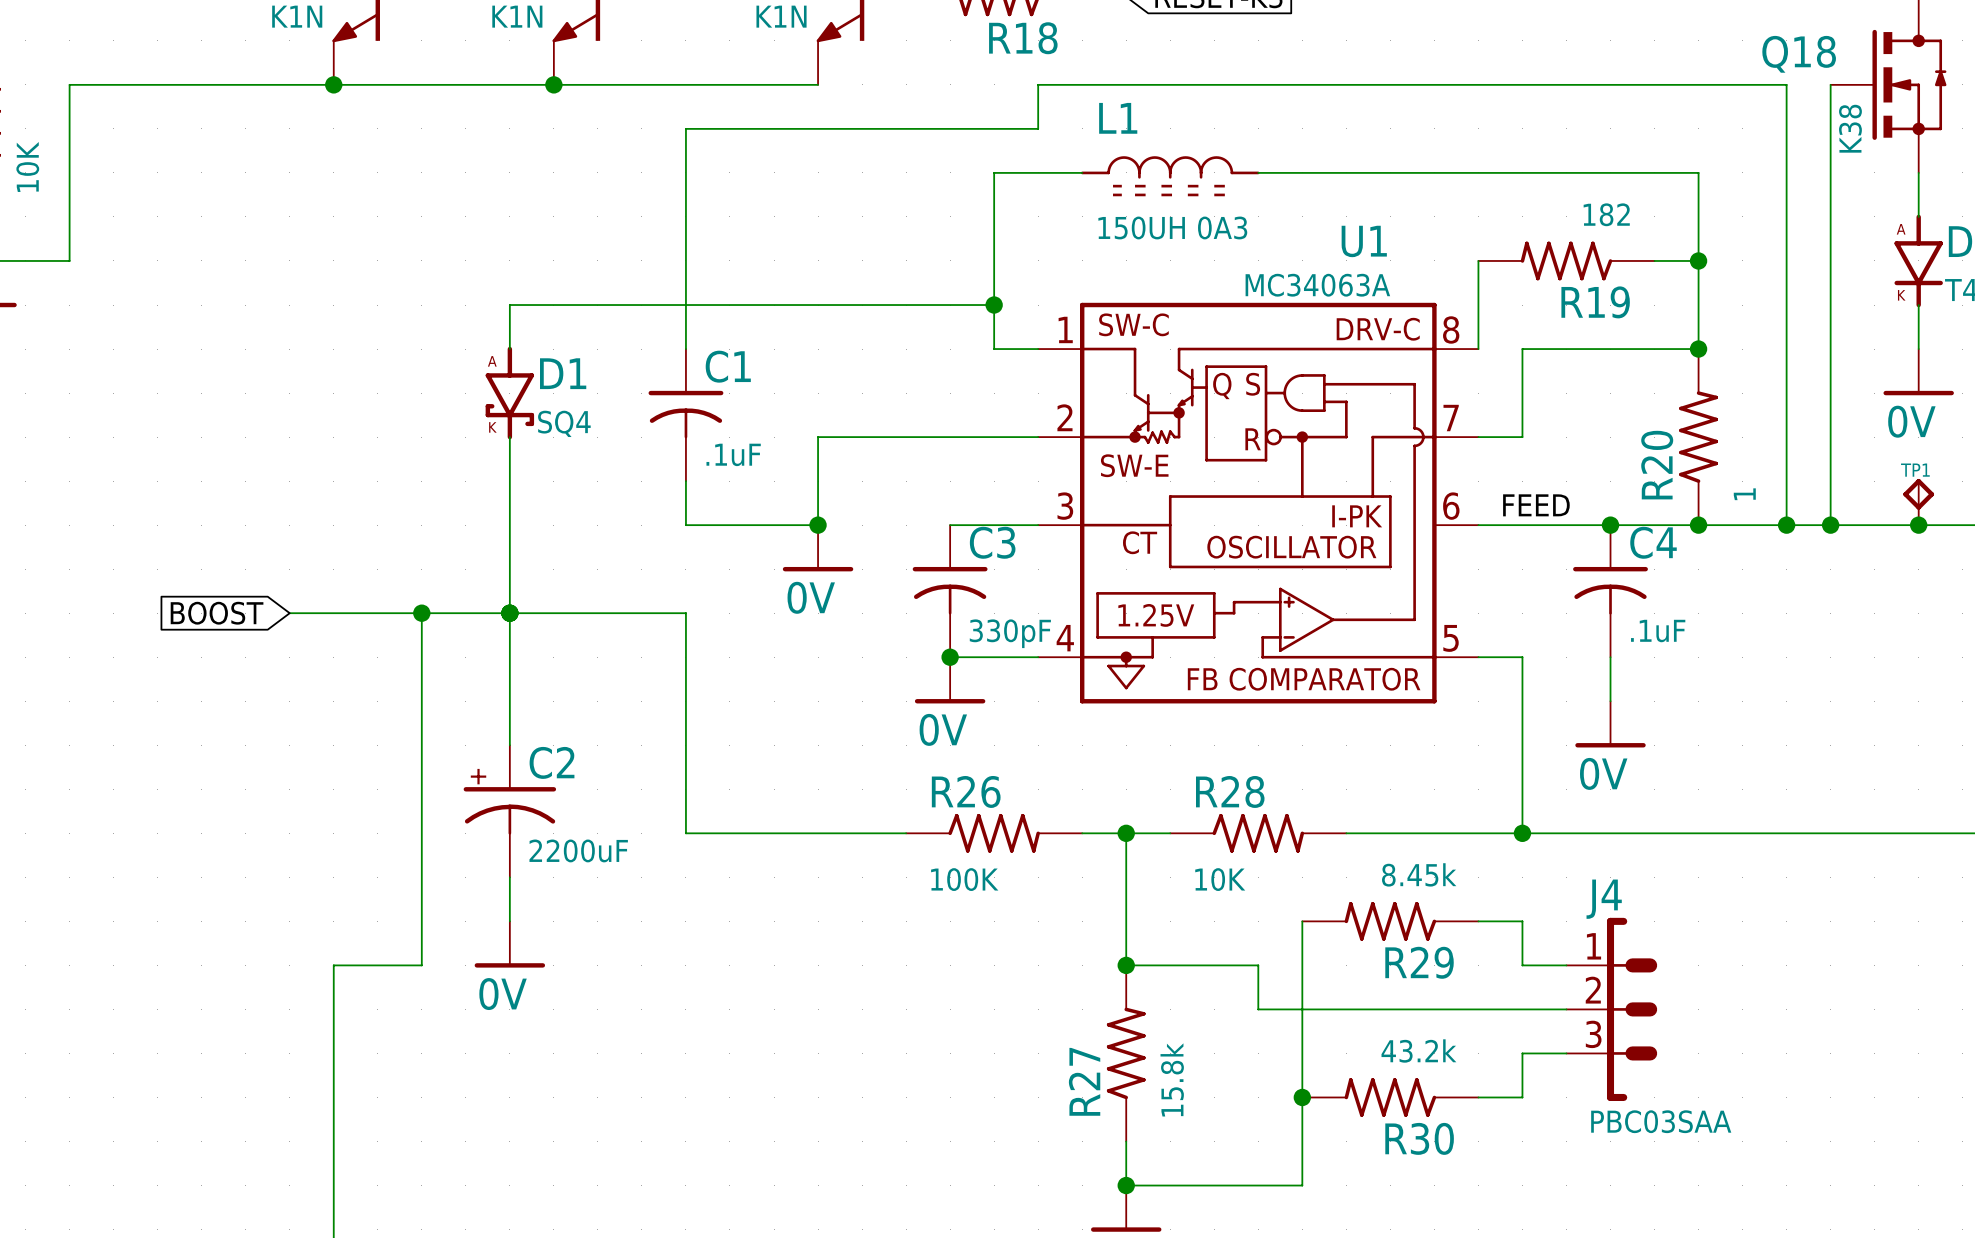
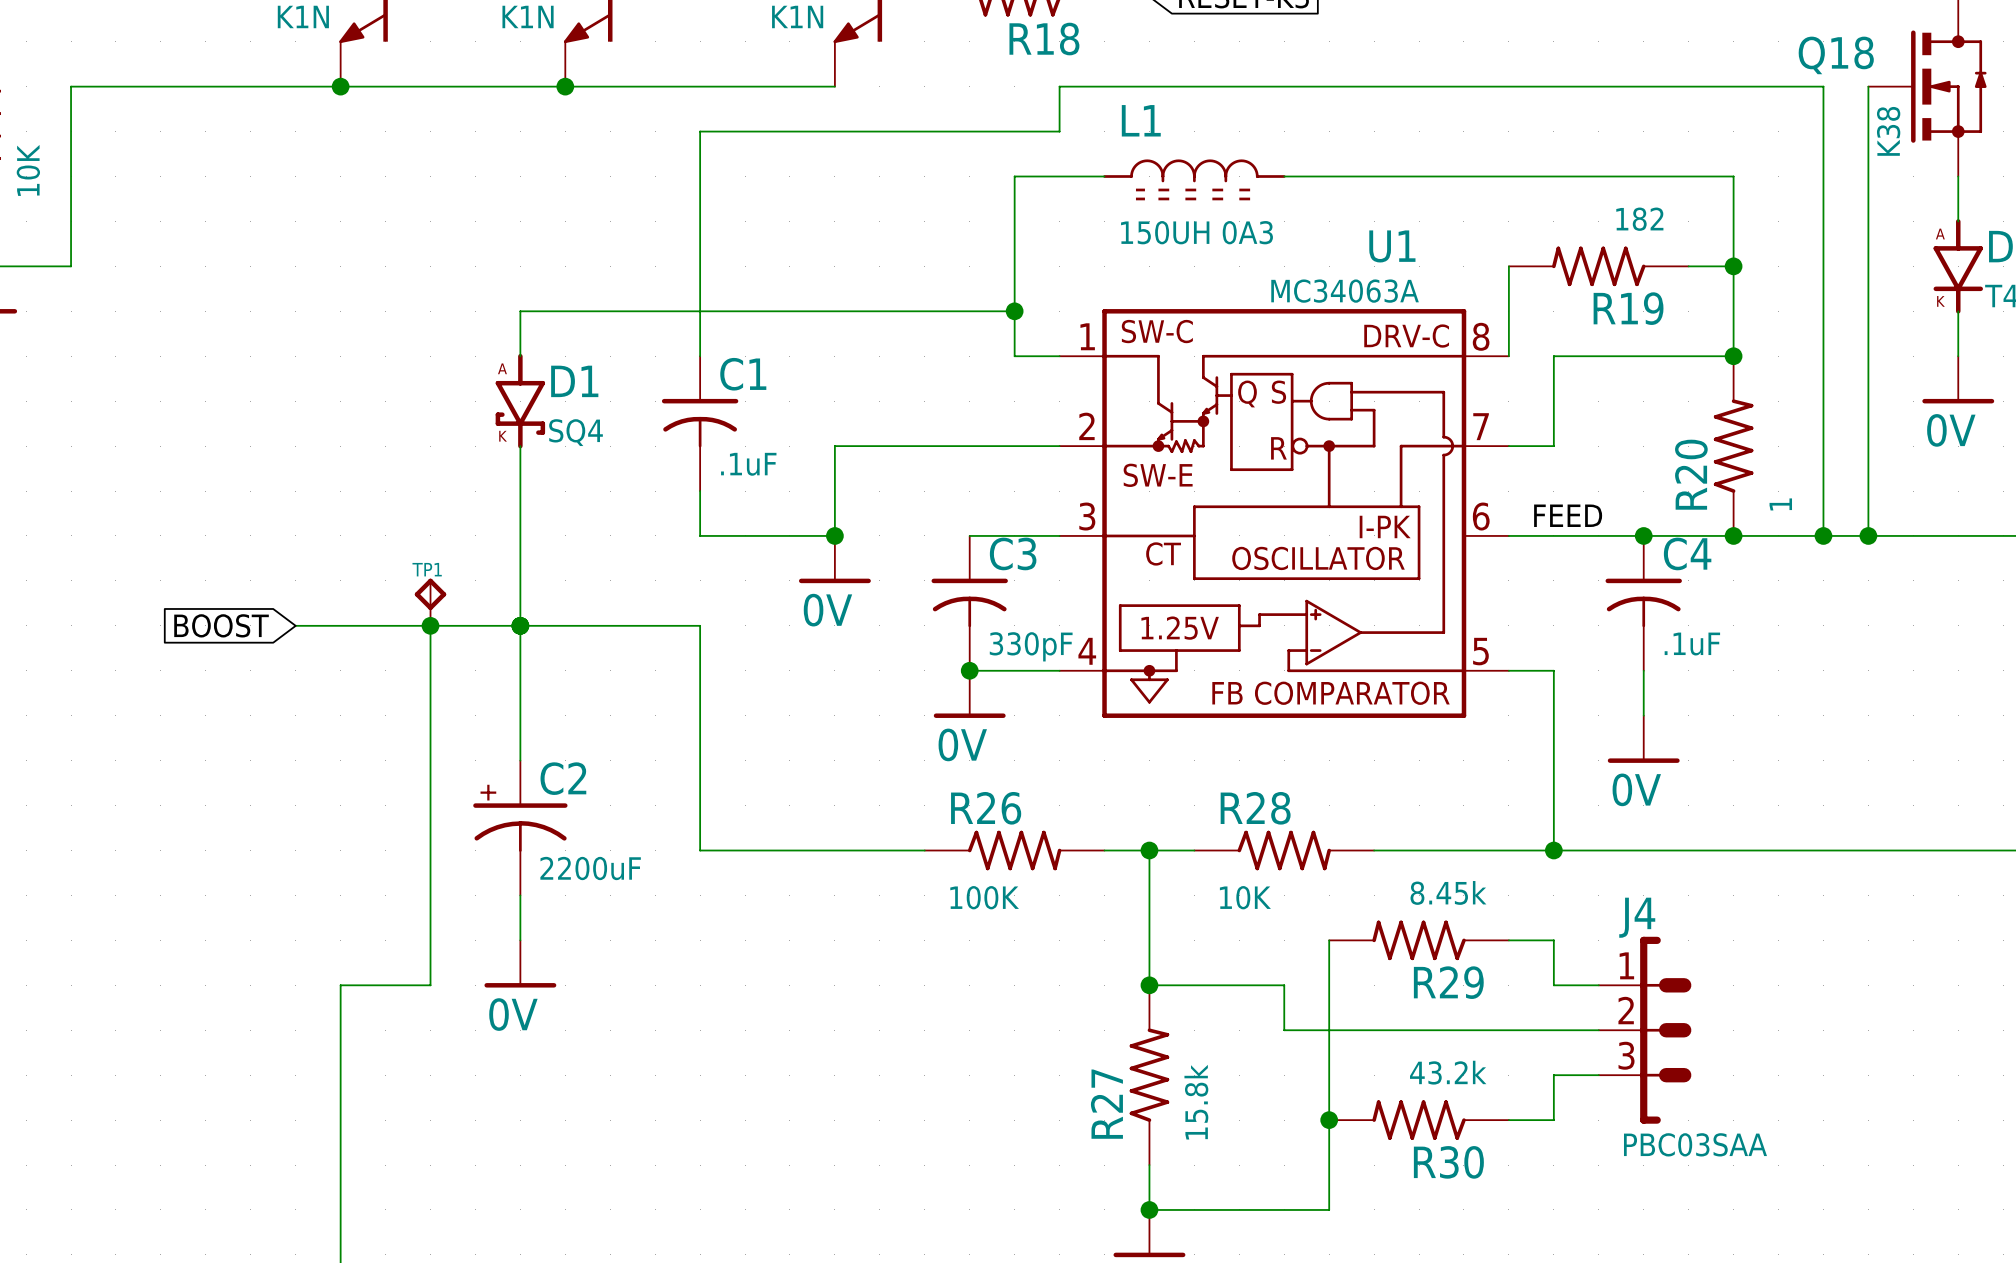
TP1 position: (1918, 502) -> (430, 602)
junction: (1918, 525) -> none

